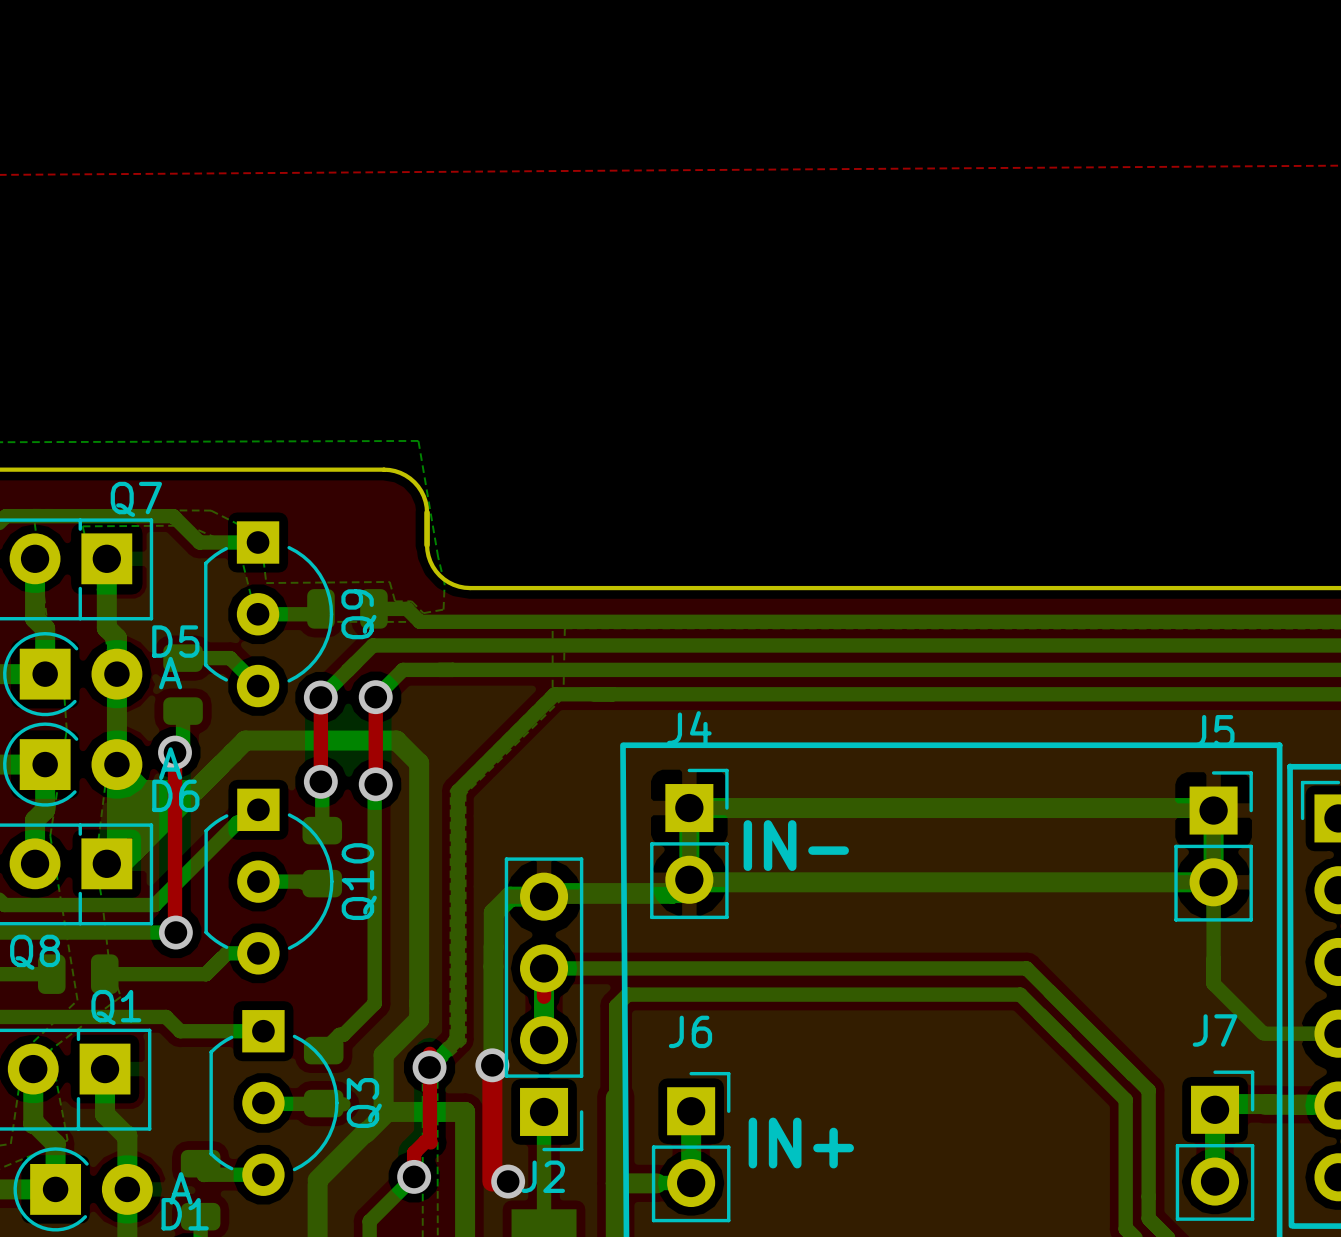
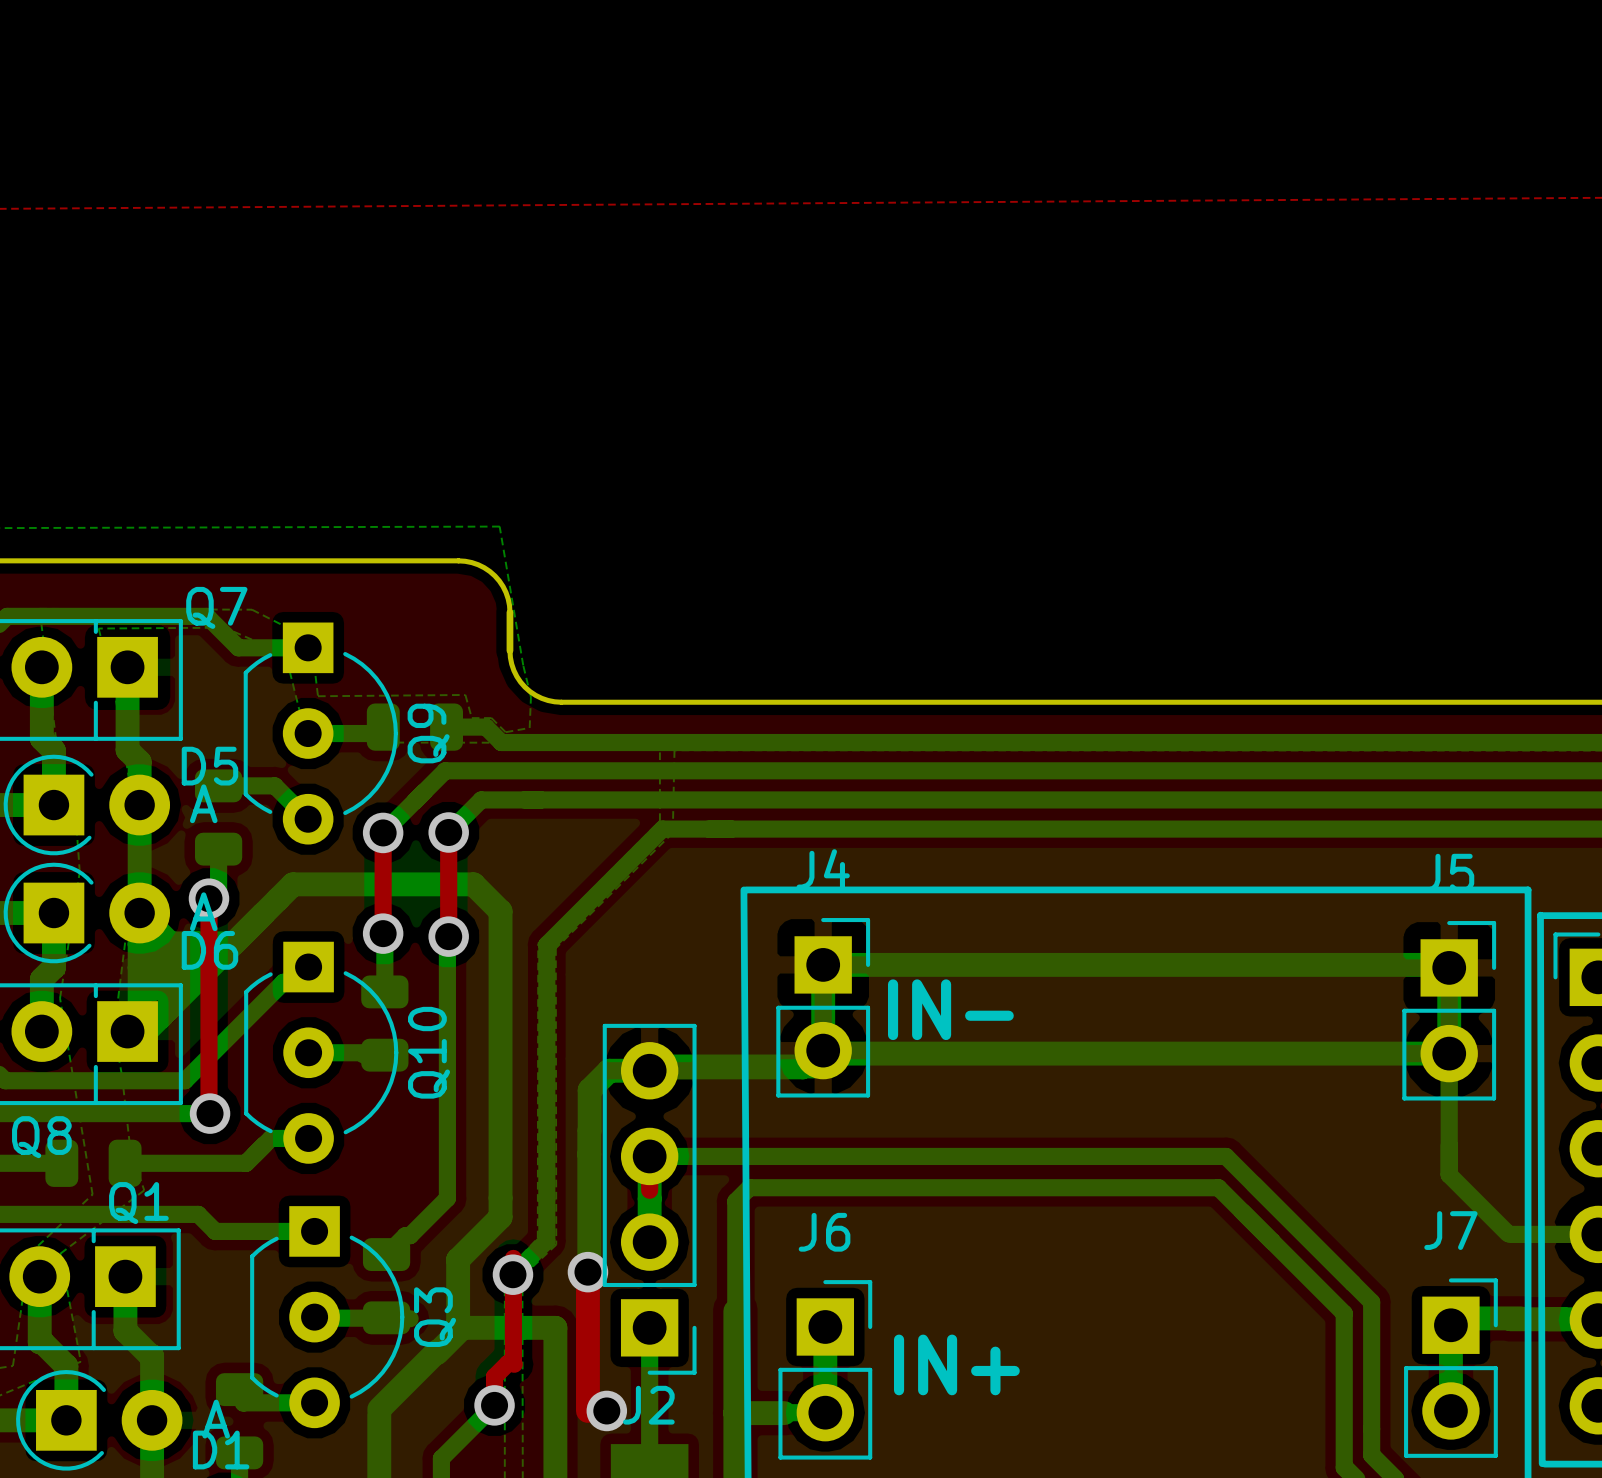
Q7 name position: Q7 (136, 499) -> Q7 (216, 607)

